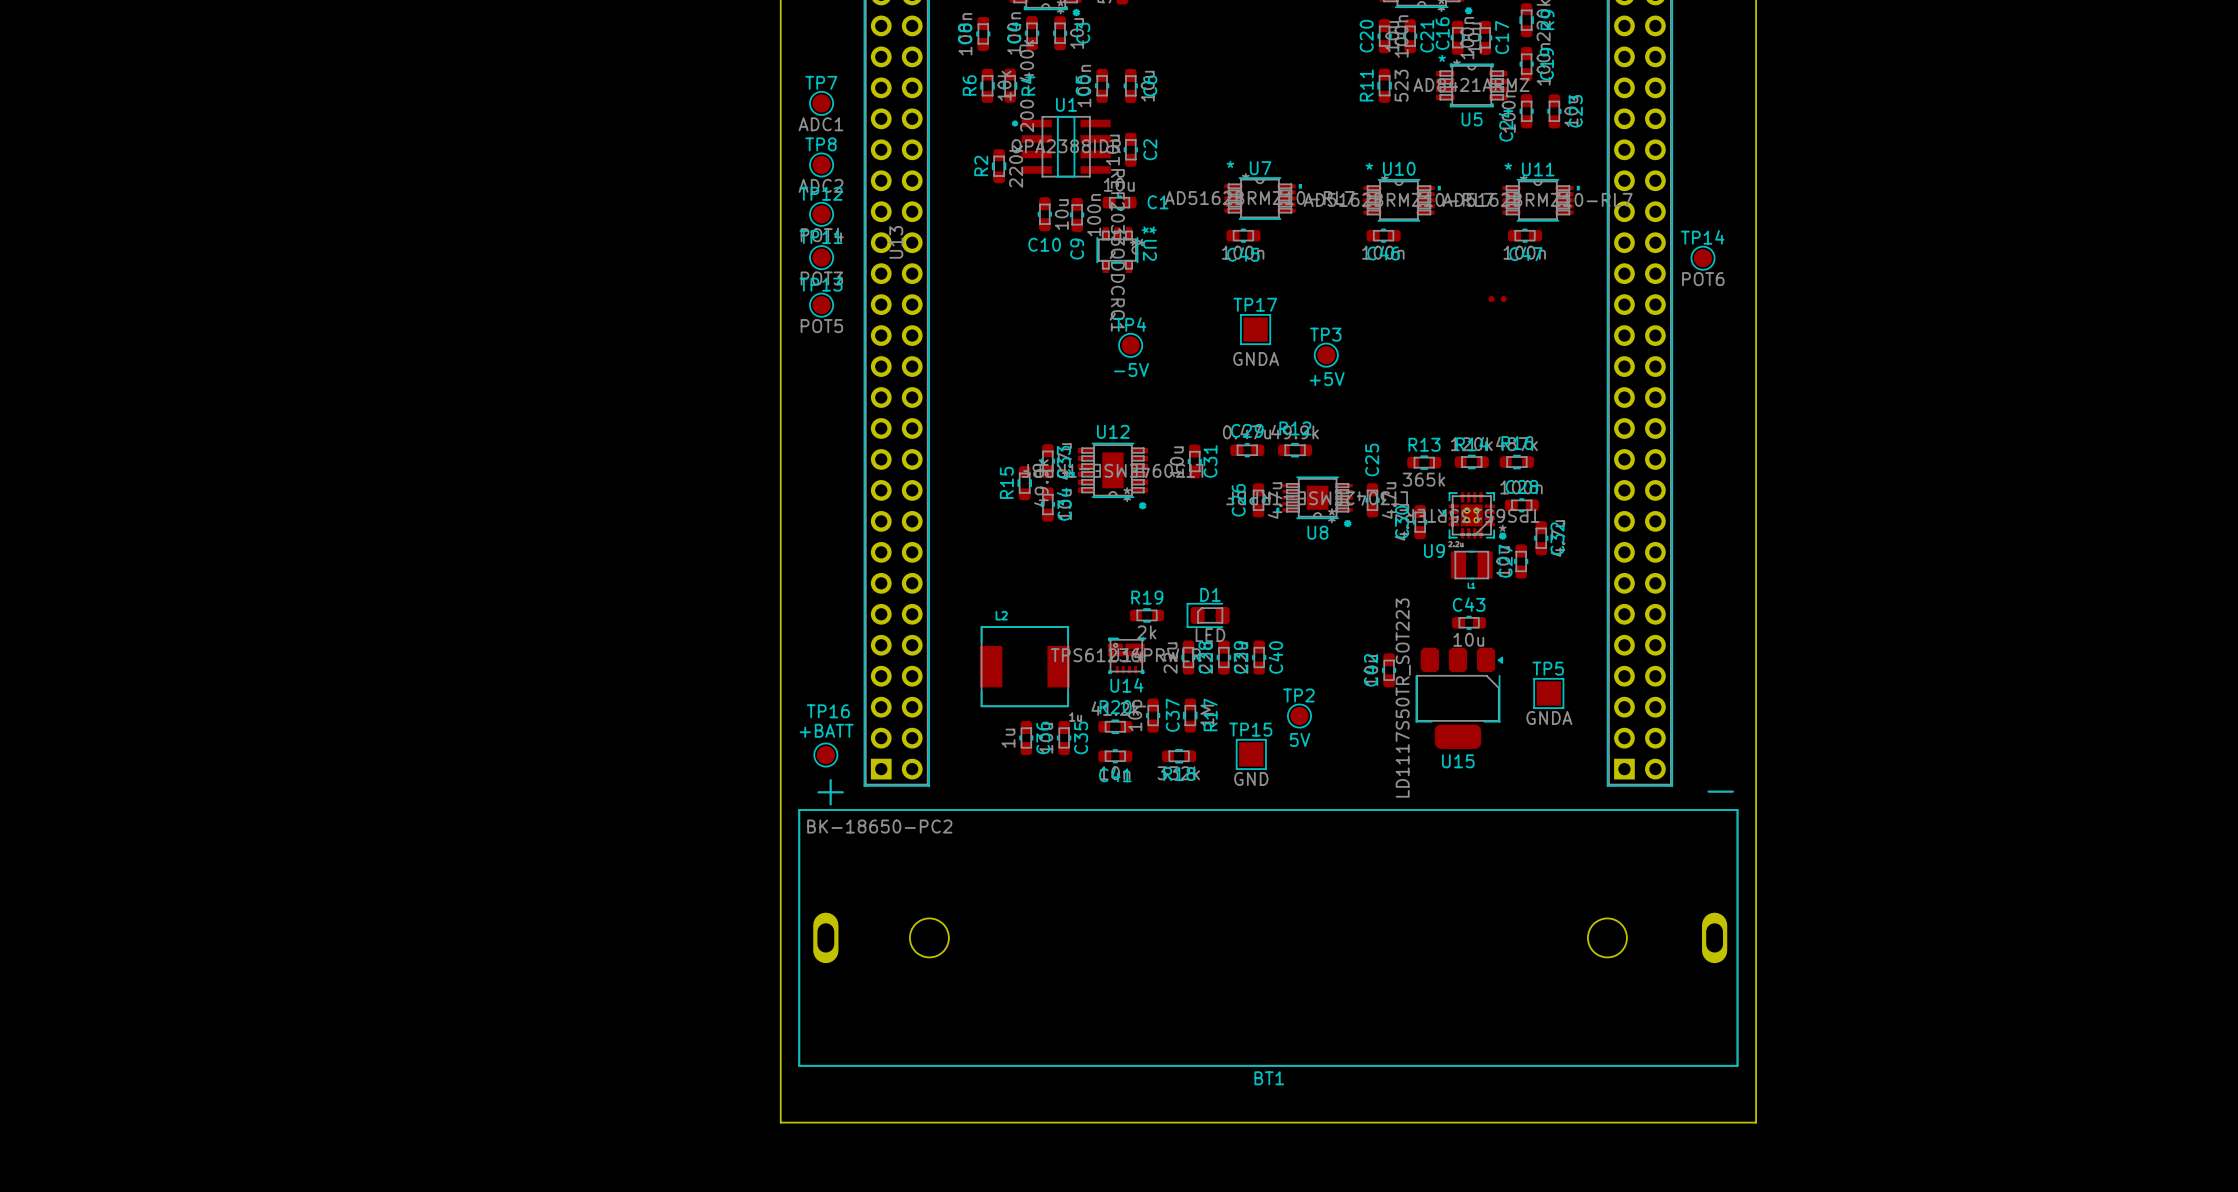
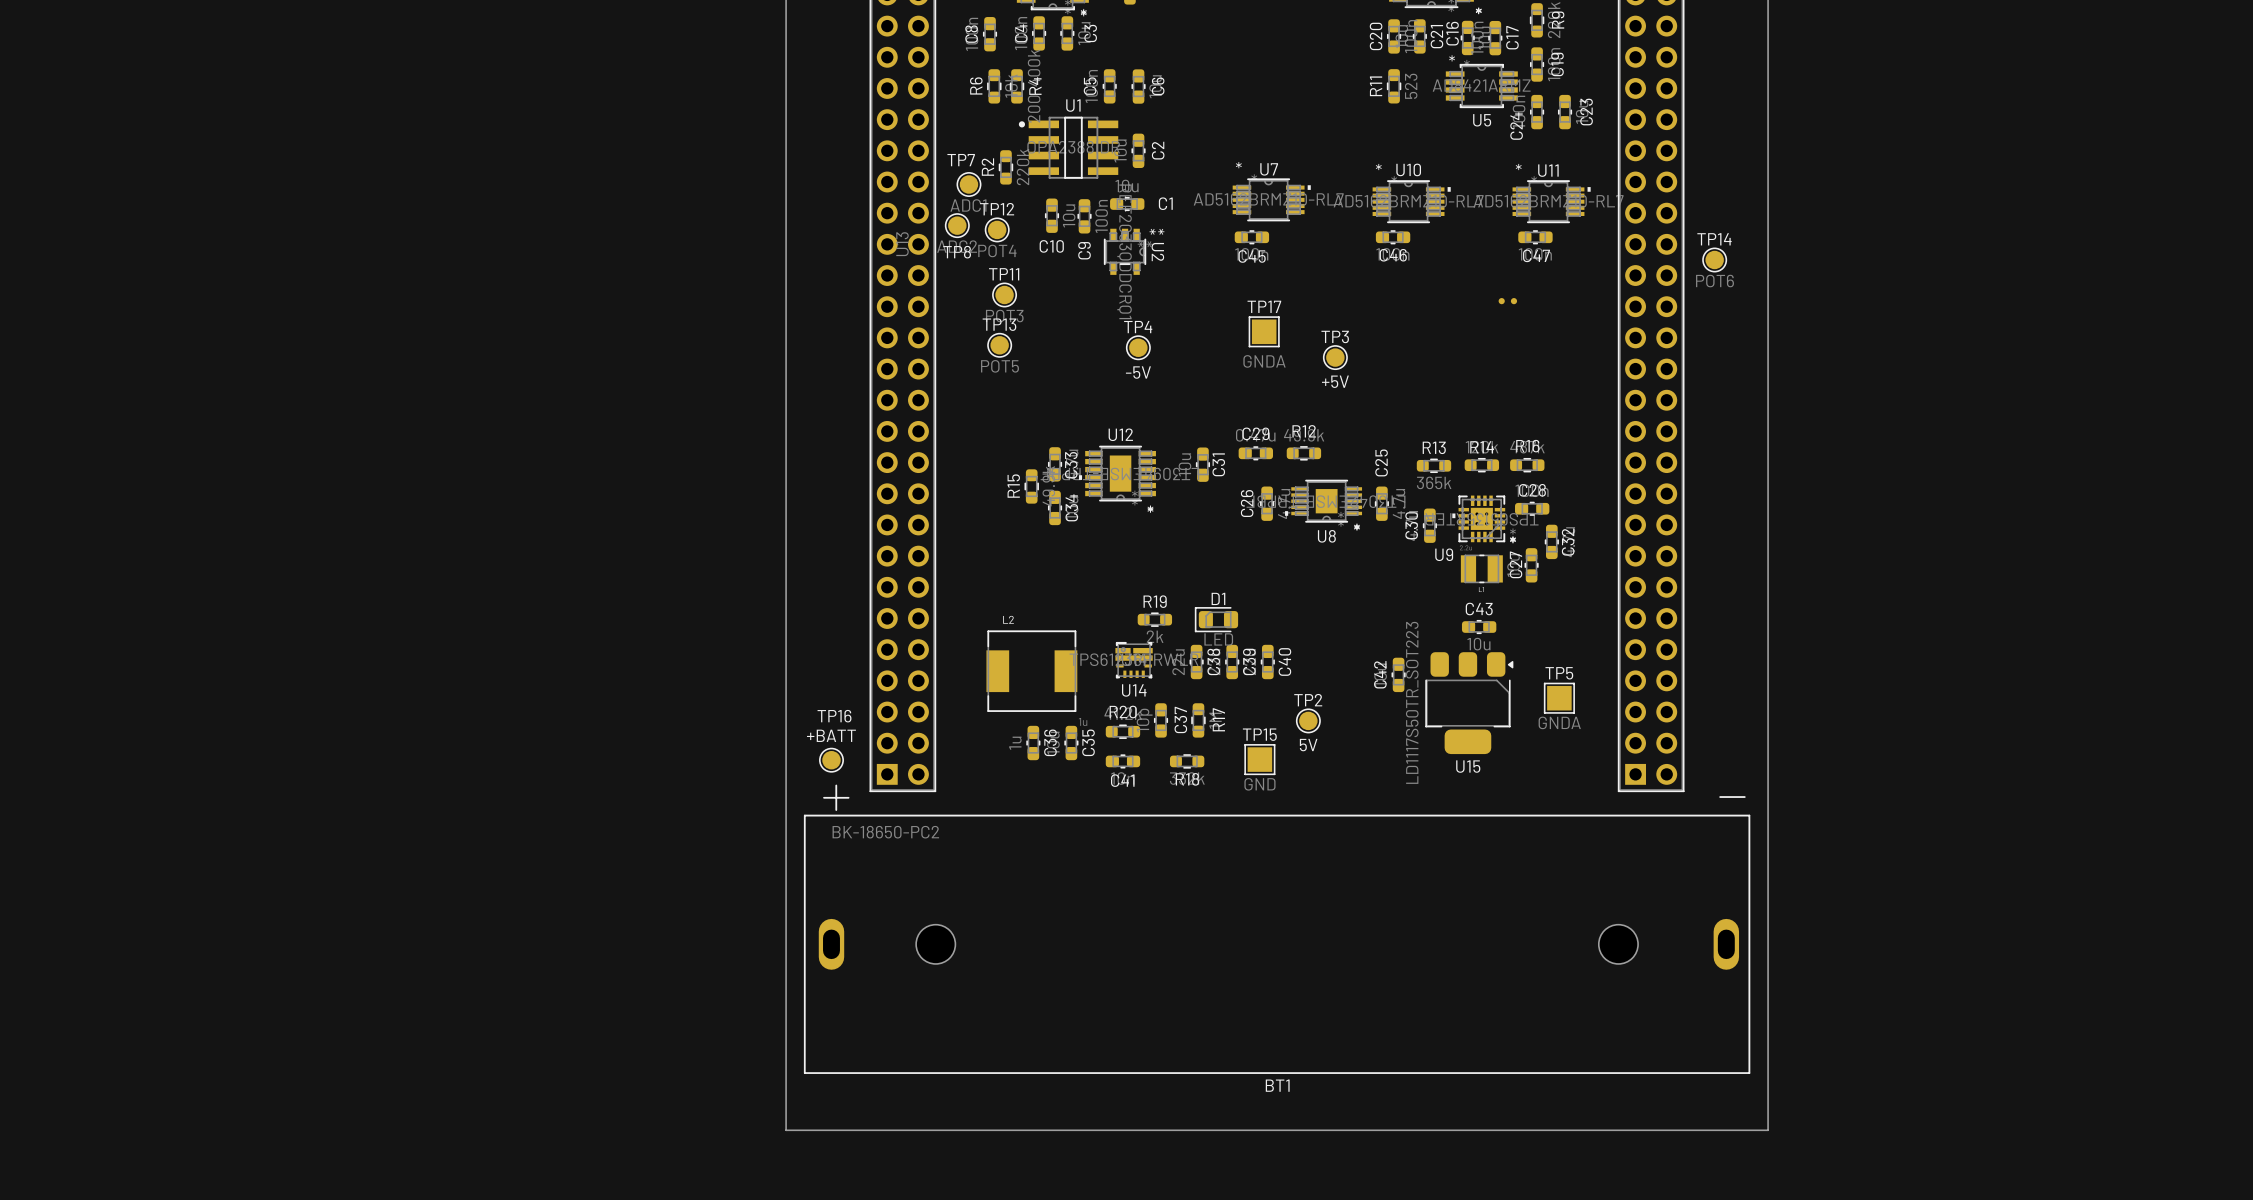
TP7 name position: TP7 (821, 82) -> TP7 (961, 160)
TP7 position: (821, 103) -> (968, 184)
TP8 name position: TP8 (821, 144) -> TP8 (957, 252)
TP8 position: (821, 164) -> (957, 225)
TP12 position: (821, 214) -> (997, 229)
TP11 position: (821, 257) -> (1004, 294)
TP13 position: (821, 305) -> (999, 345)

